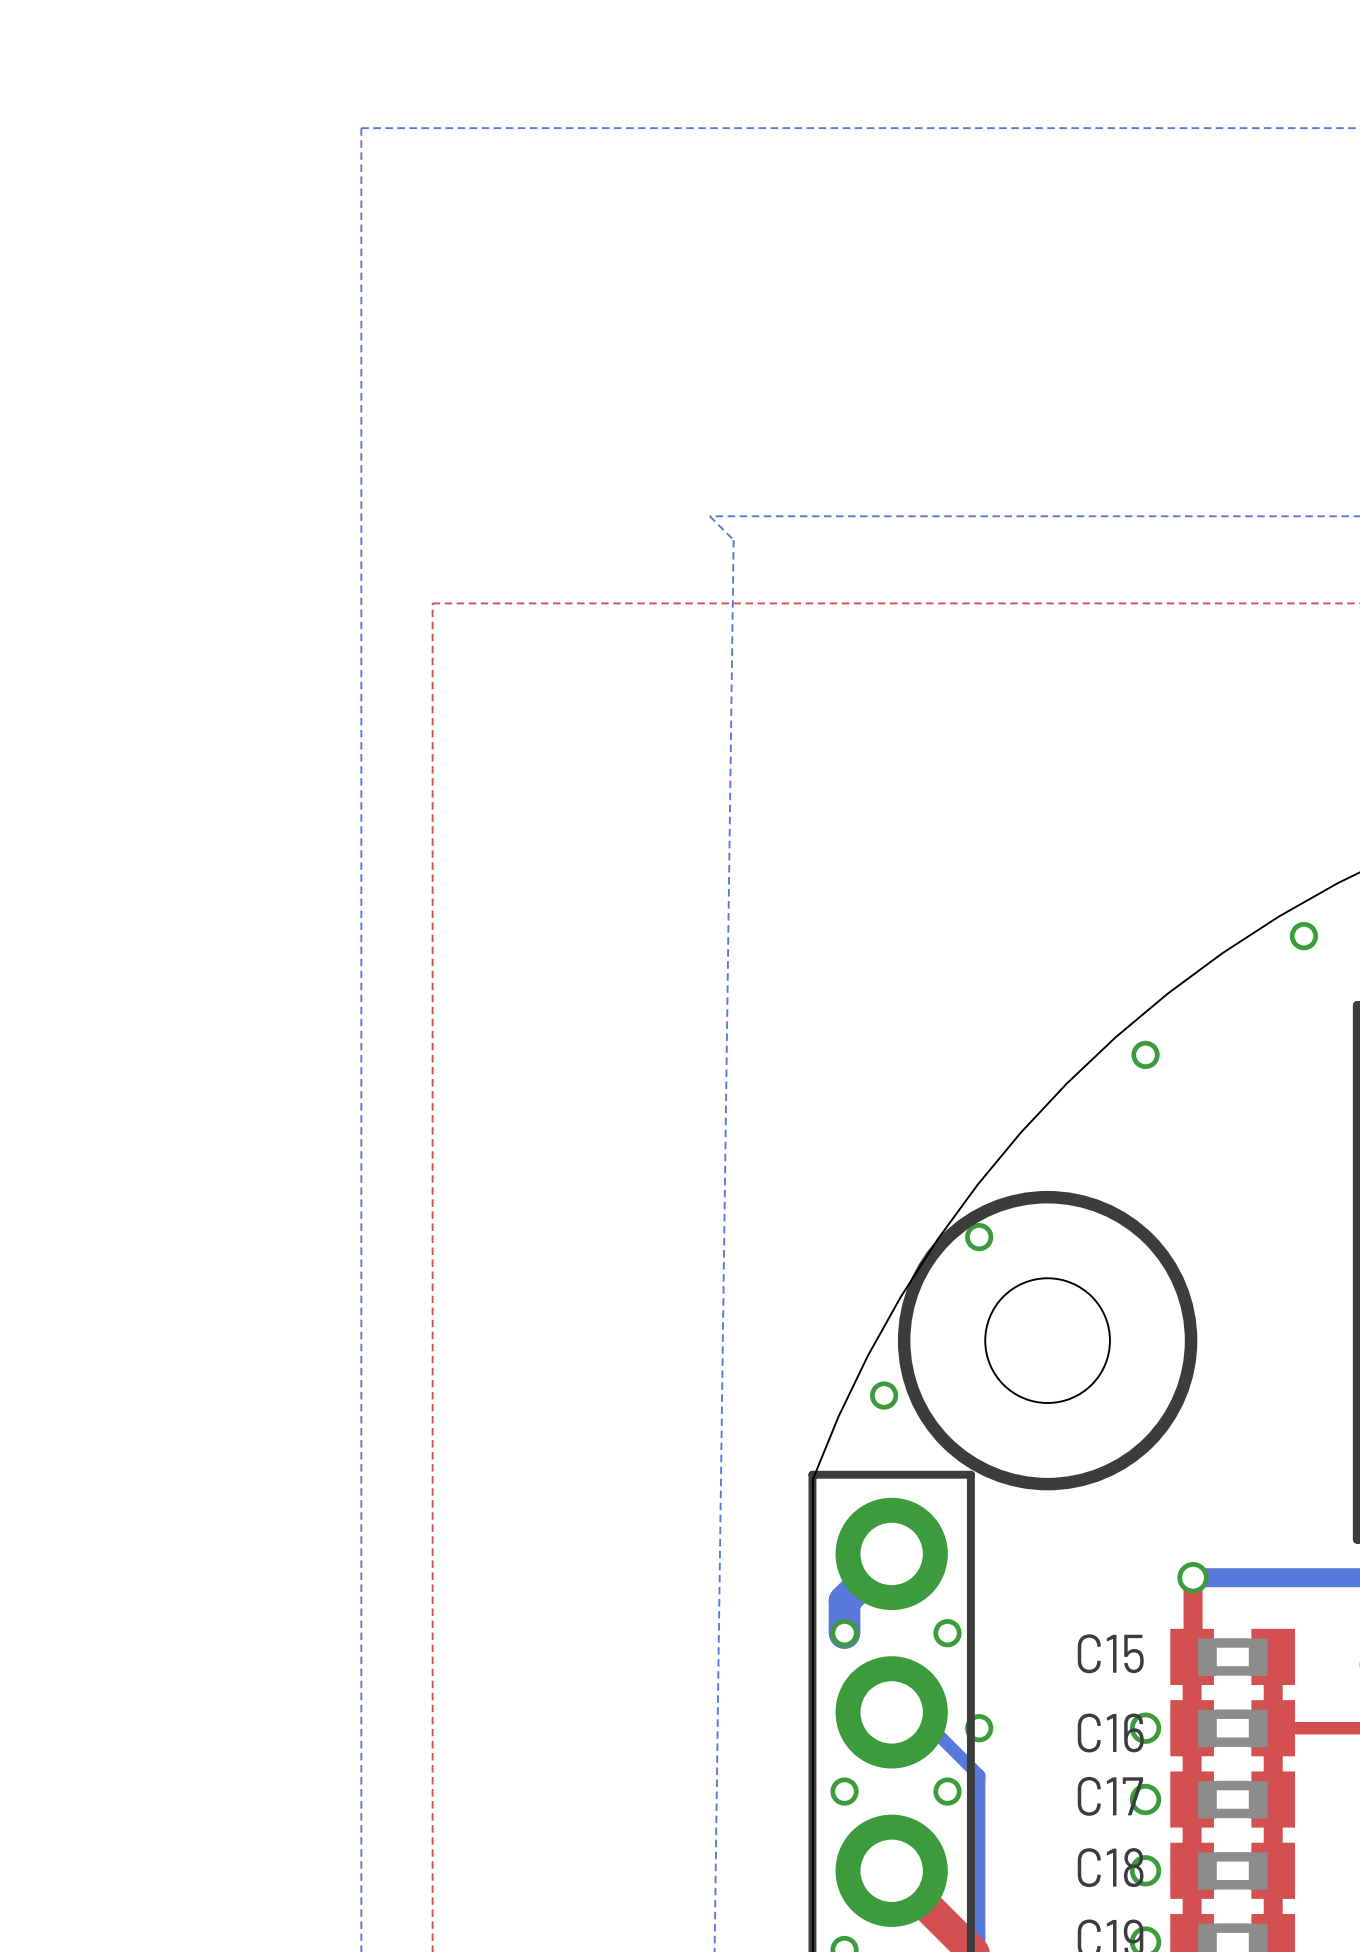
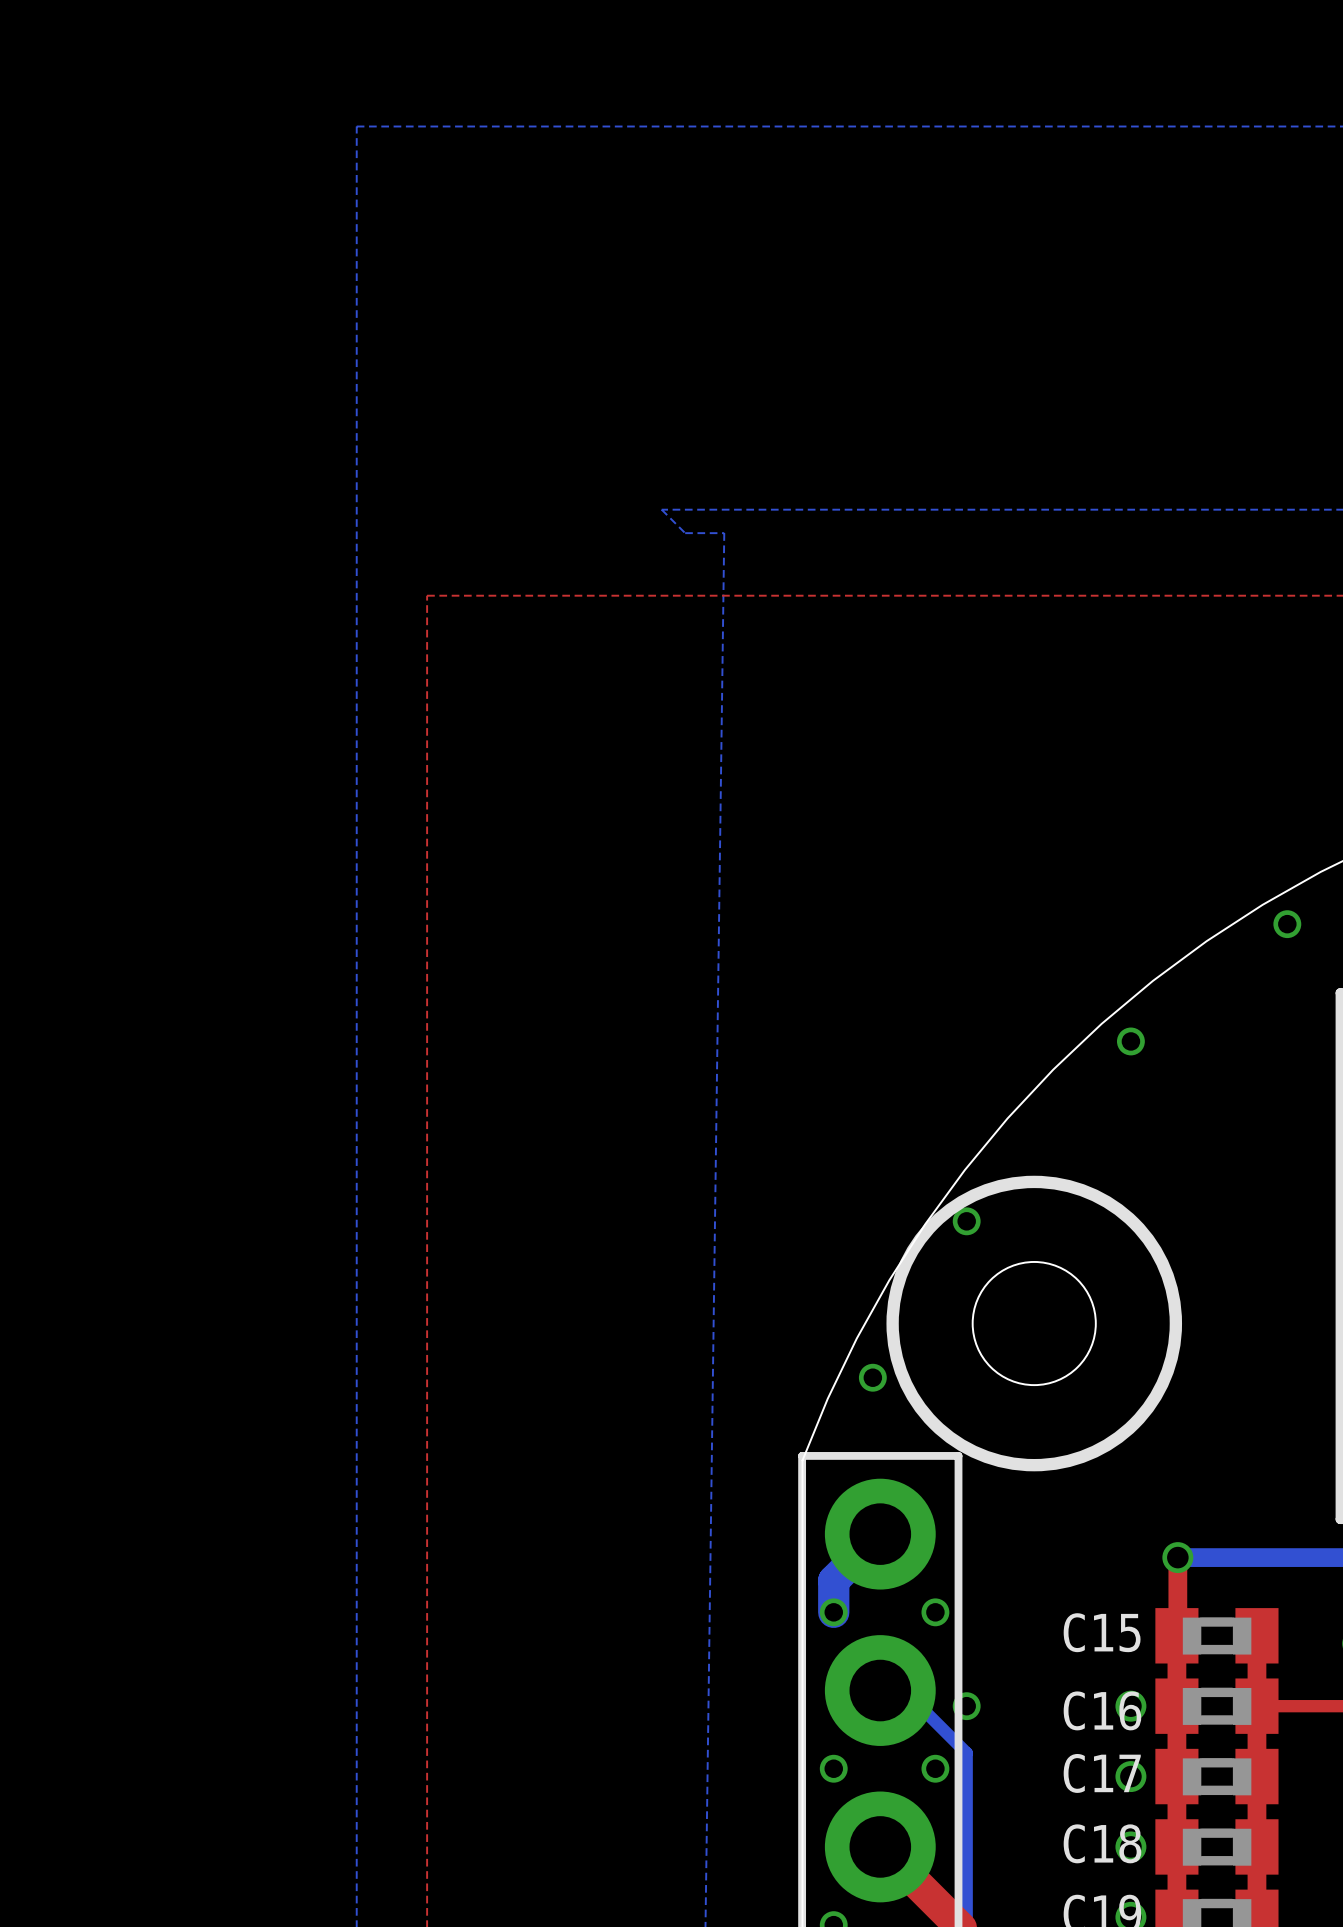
bottom zone outline: (709, 516) (733, 540) -> (700, 509) (661, 509) (685, 533) (724, 533)

